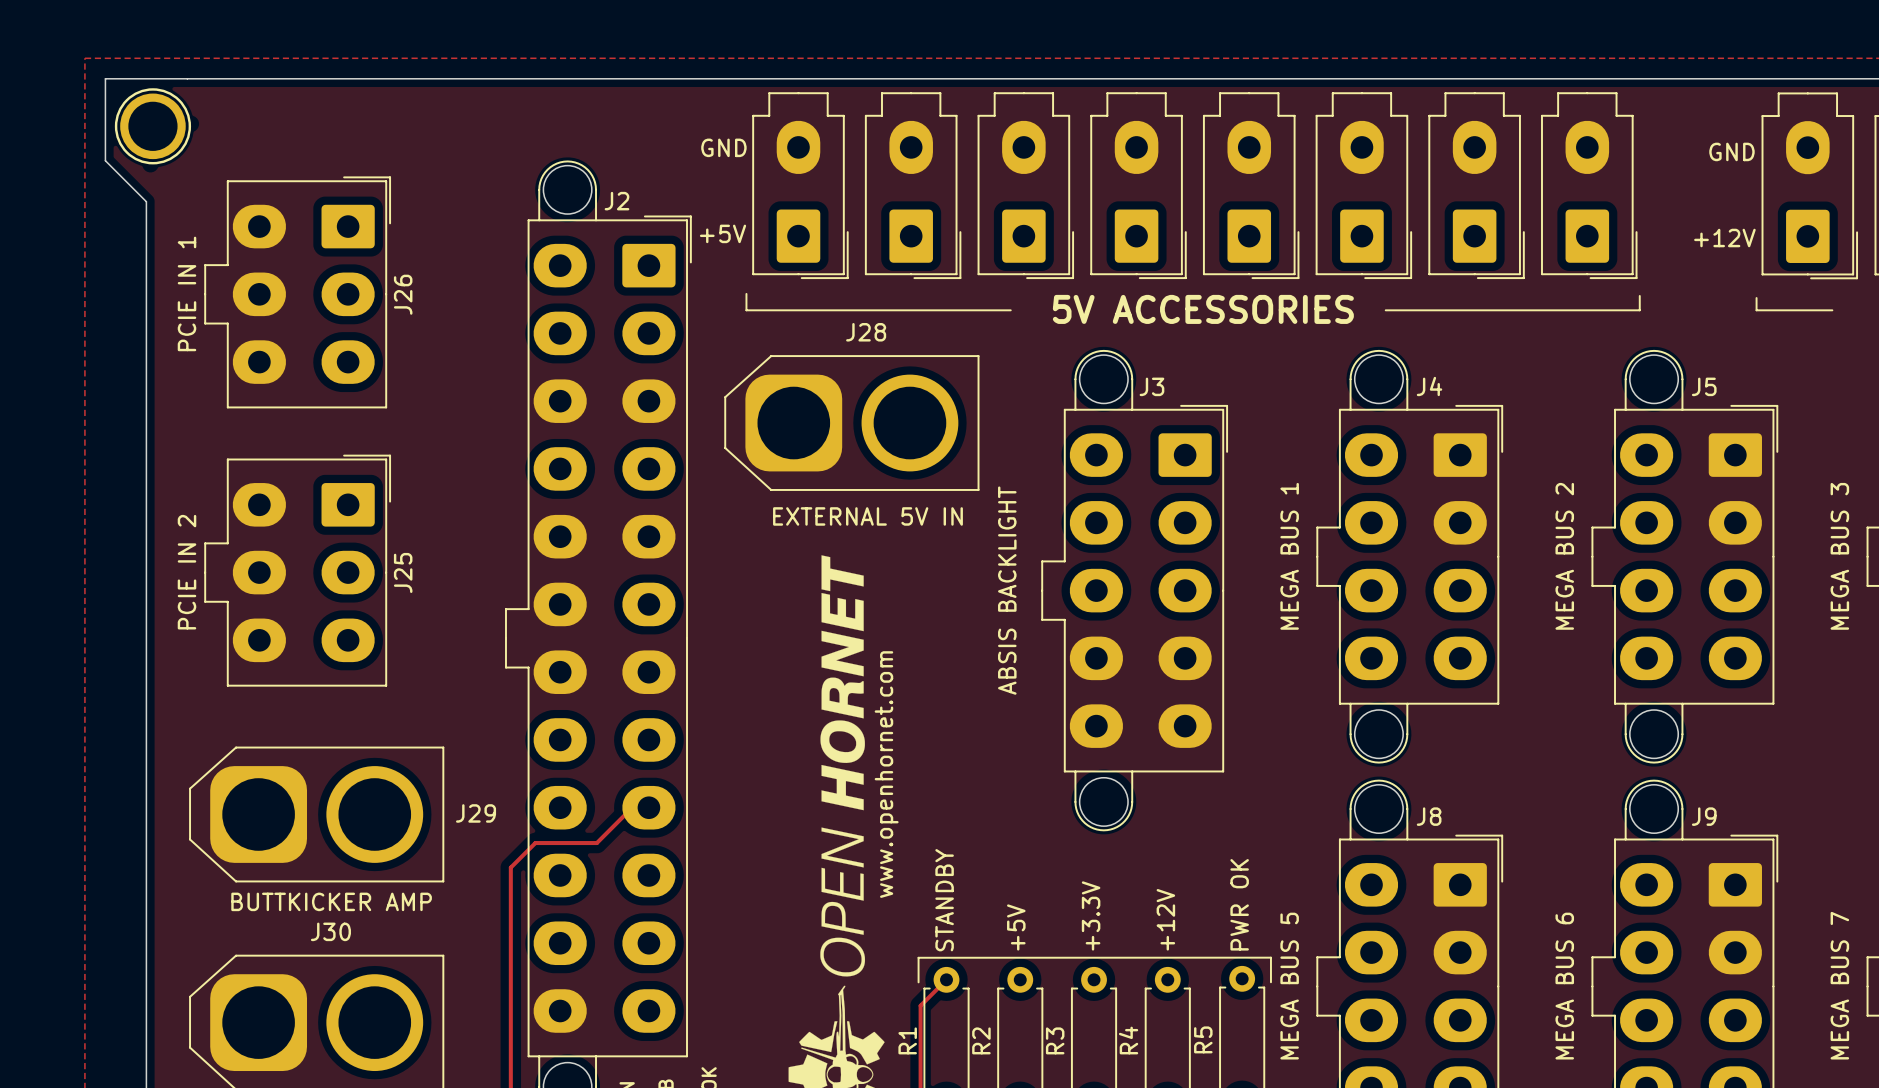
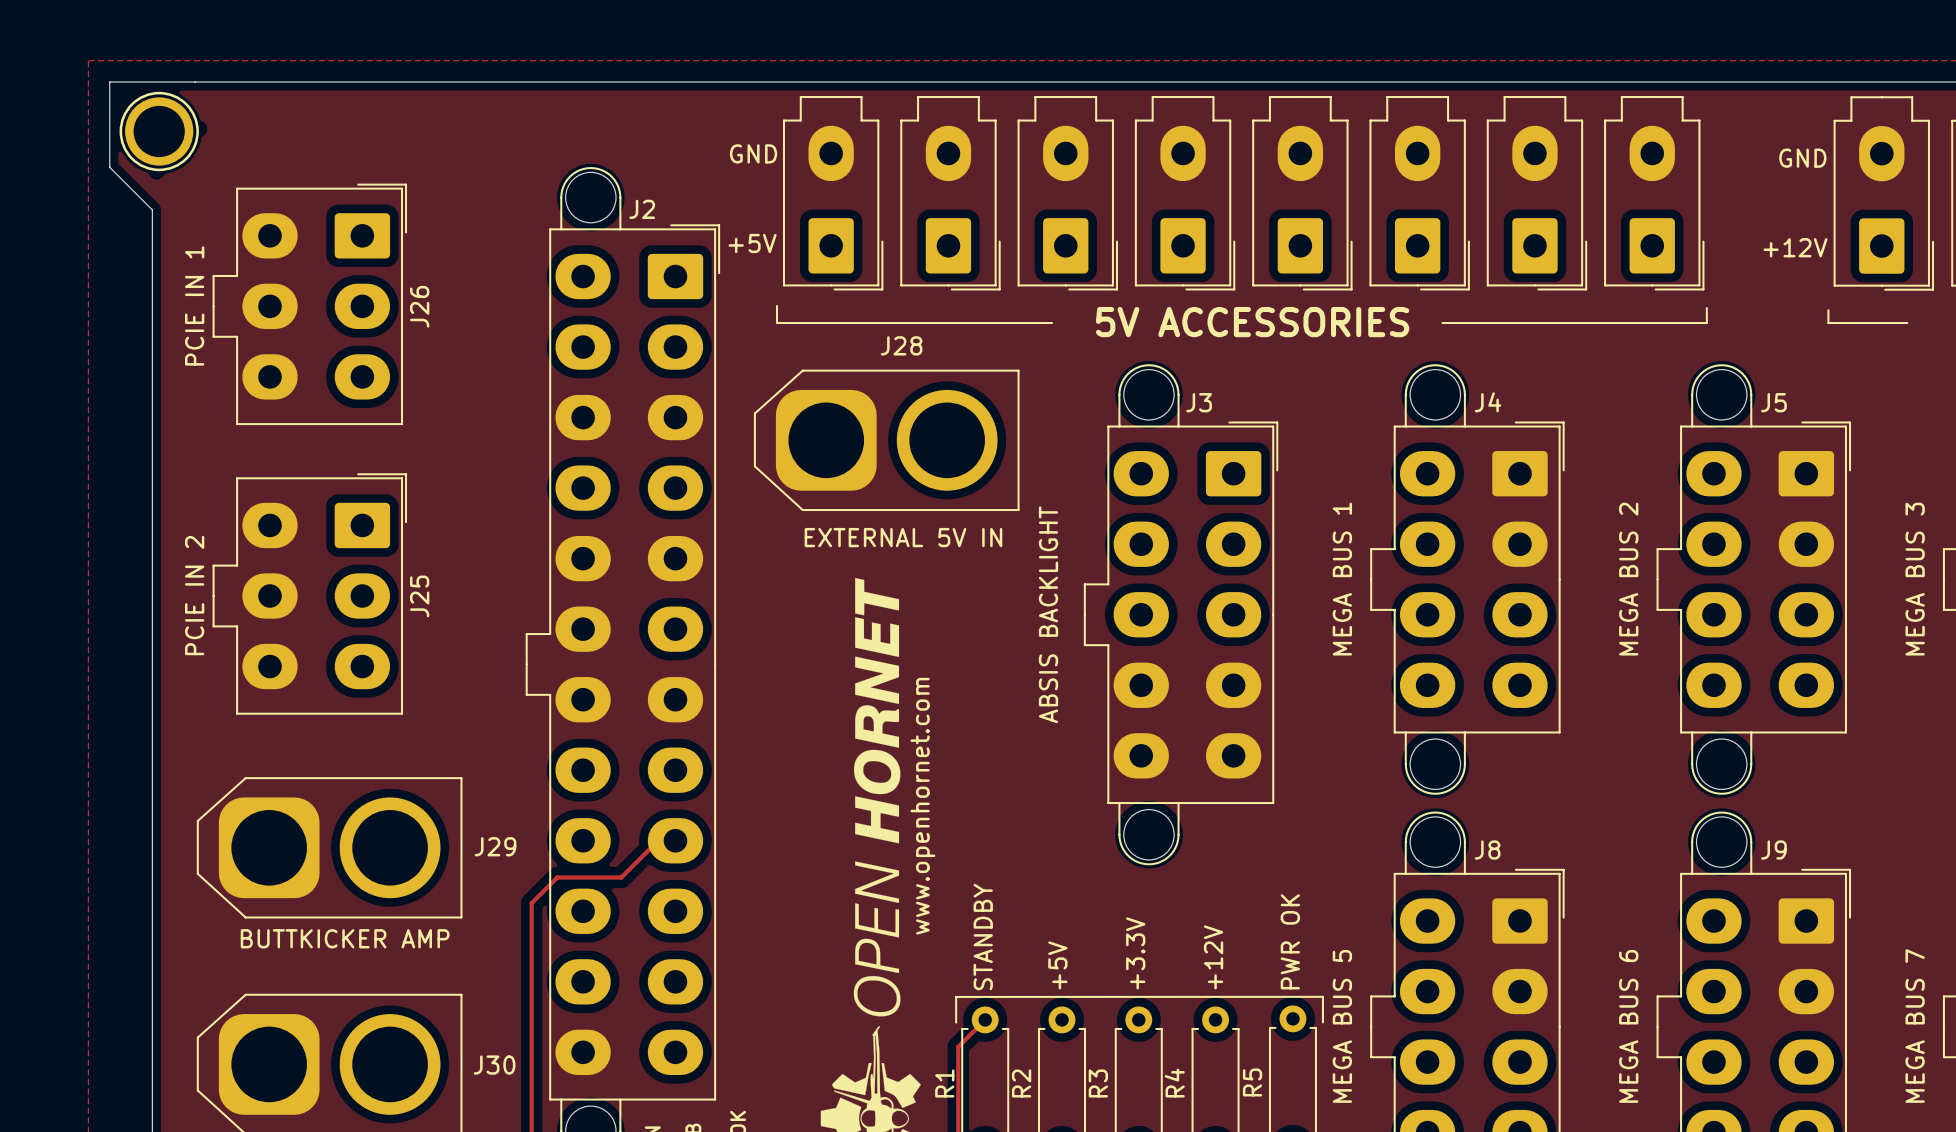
J30 name position: J30 (330, 931) -> J30 (494, 1065)

